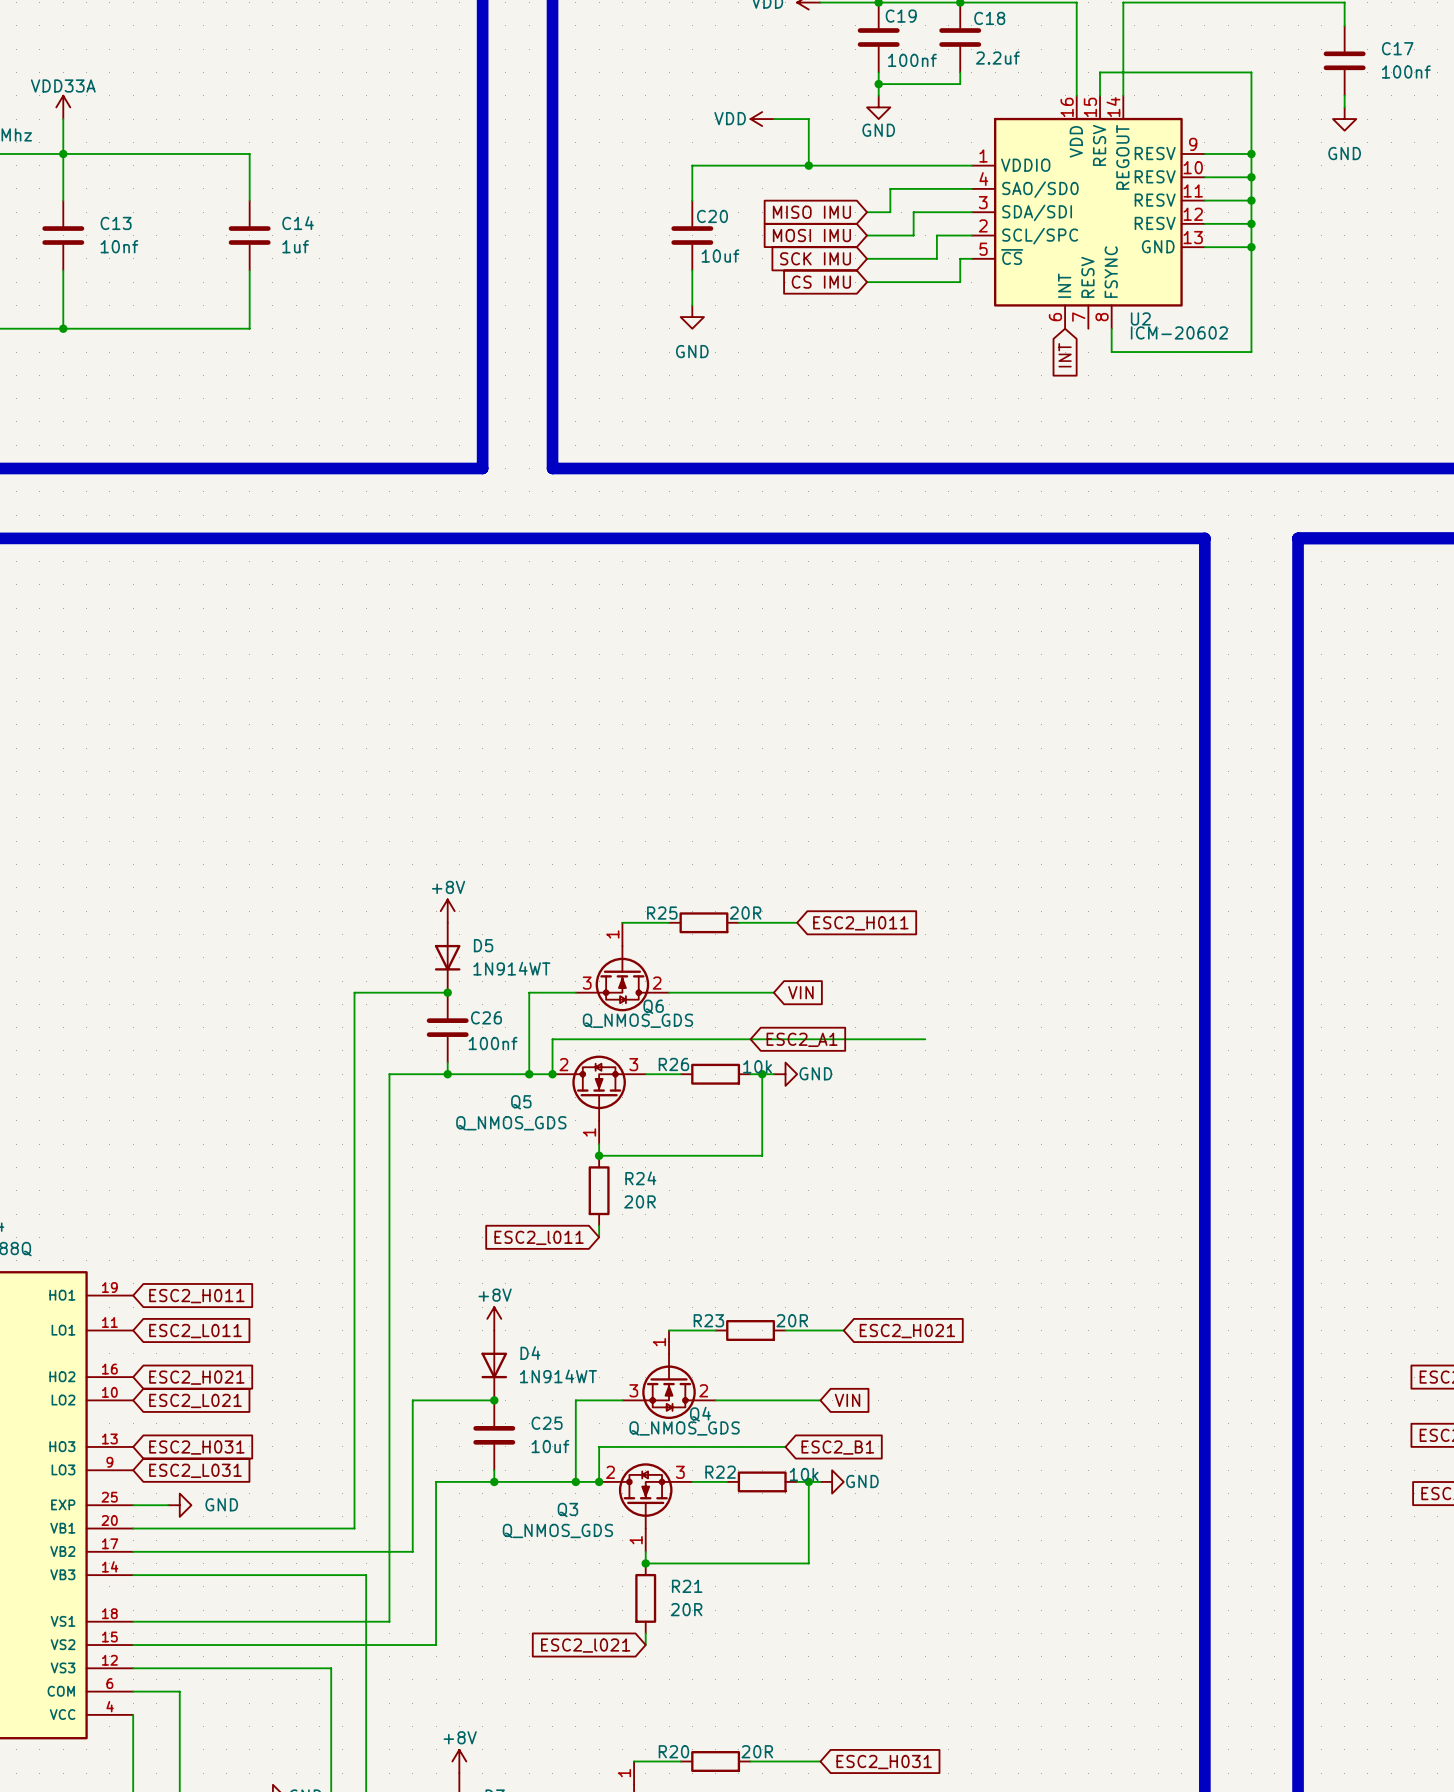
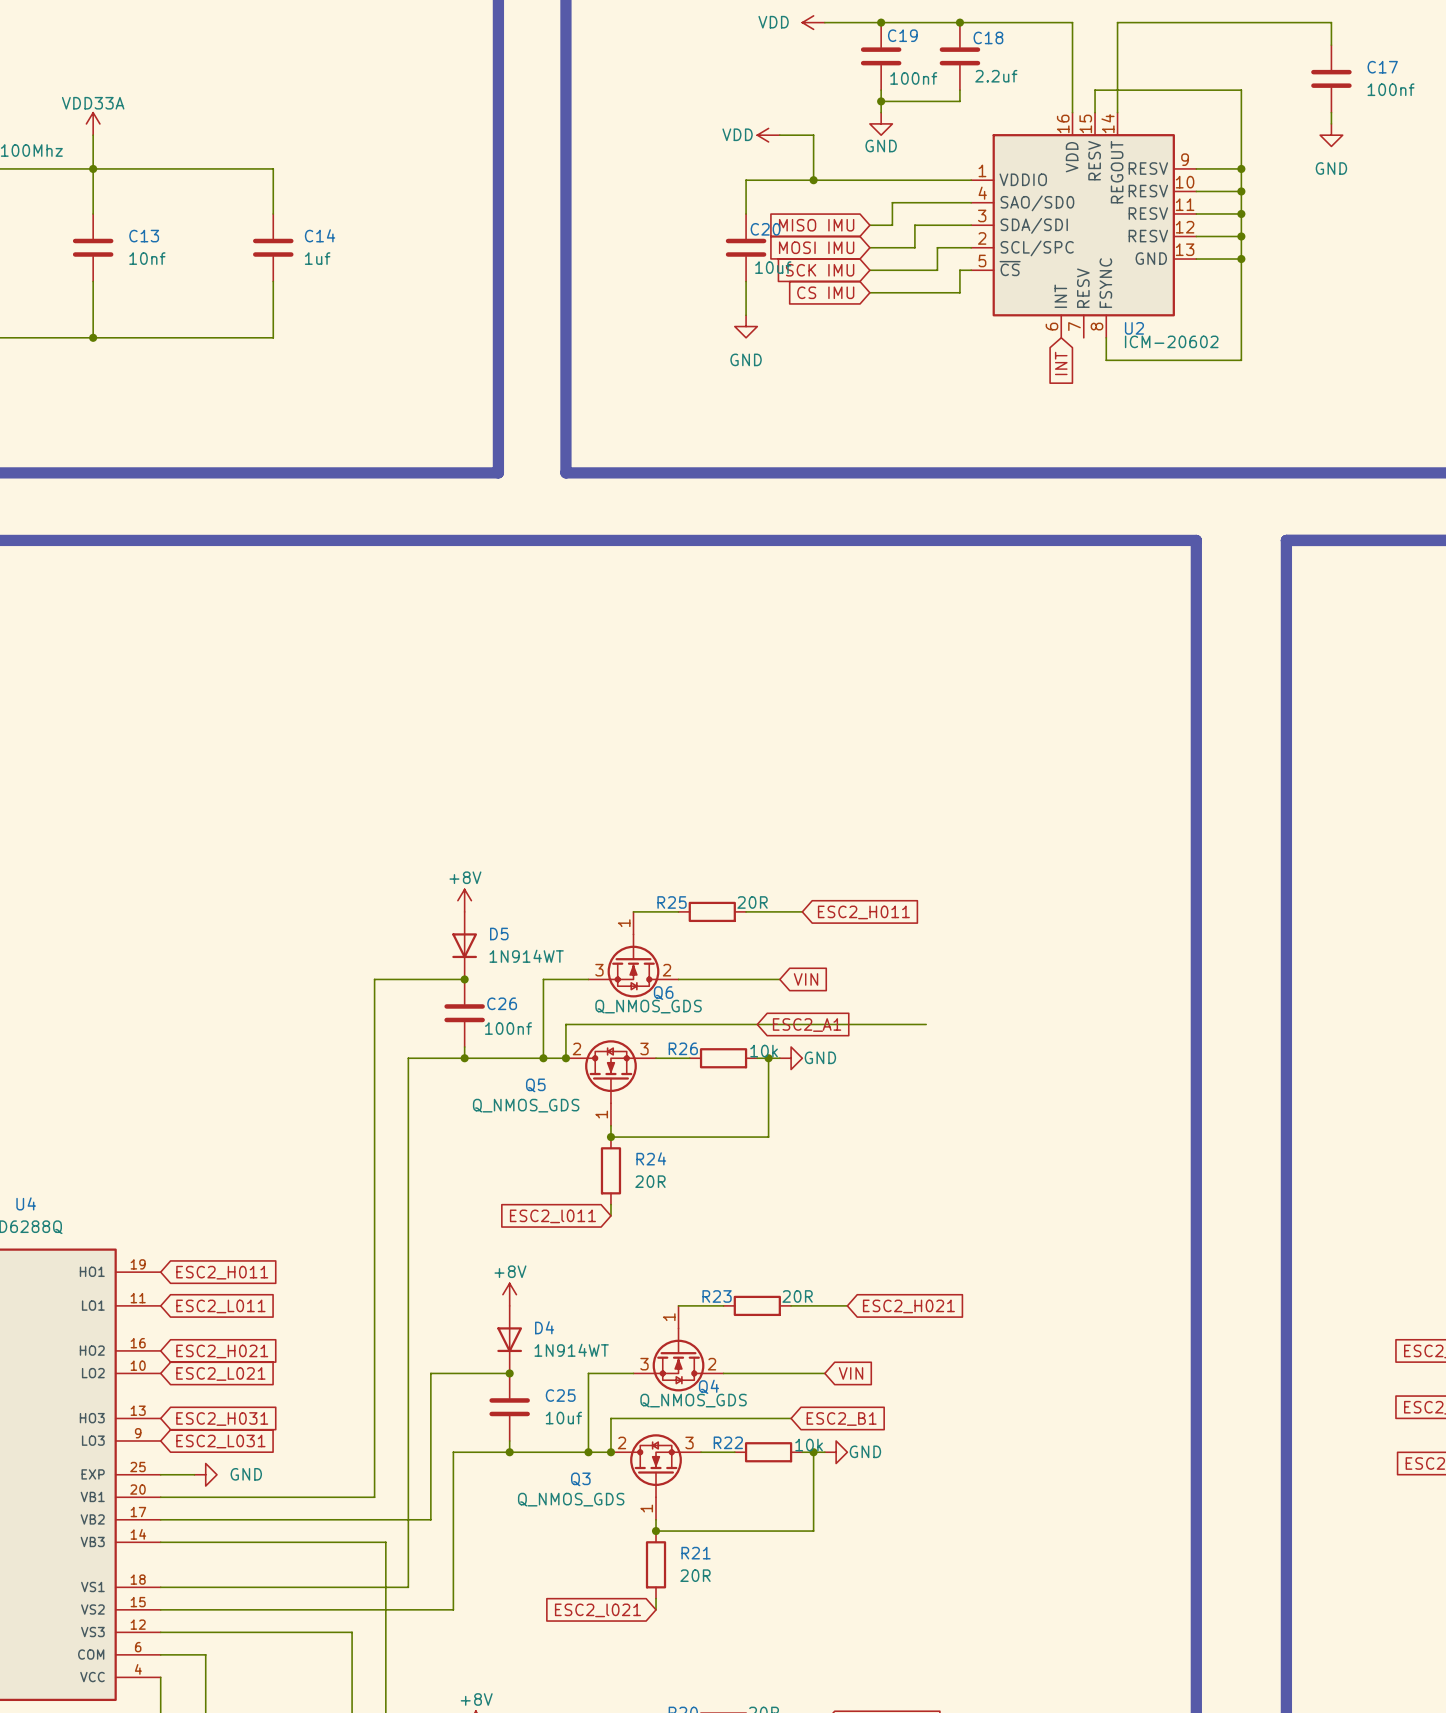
wire: (738, 165) (692, 165) (692, 200) -> (746, 180) (746, 213)
C20 position: (692, 235) -> (746, 247)
wire: (692, 270) (692, 305) -> (746, 281) (746, 315)
power symbol position: GND (692, 317) -> GND (746, 326)

